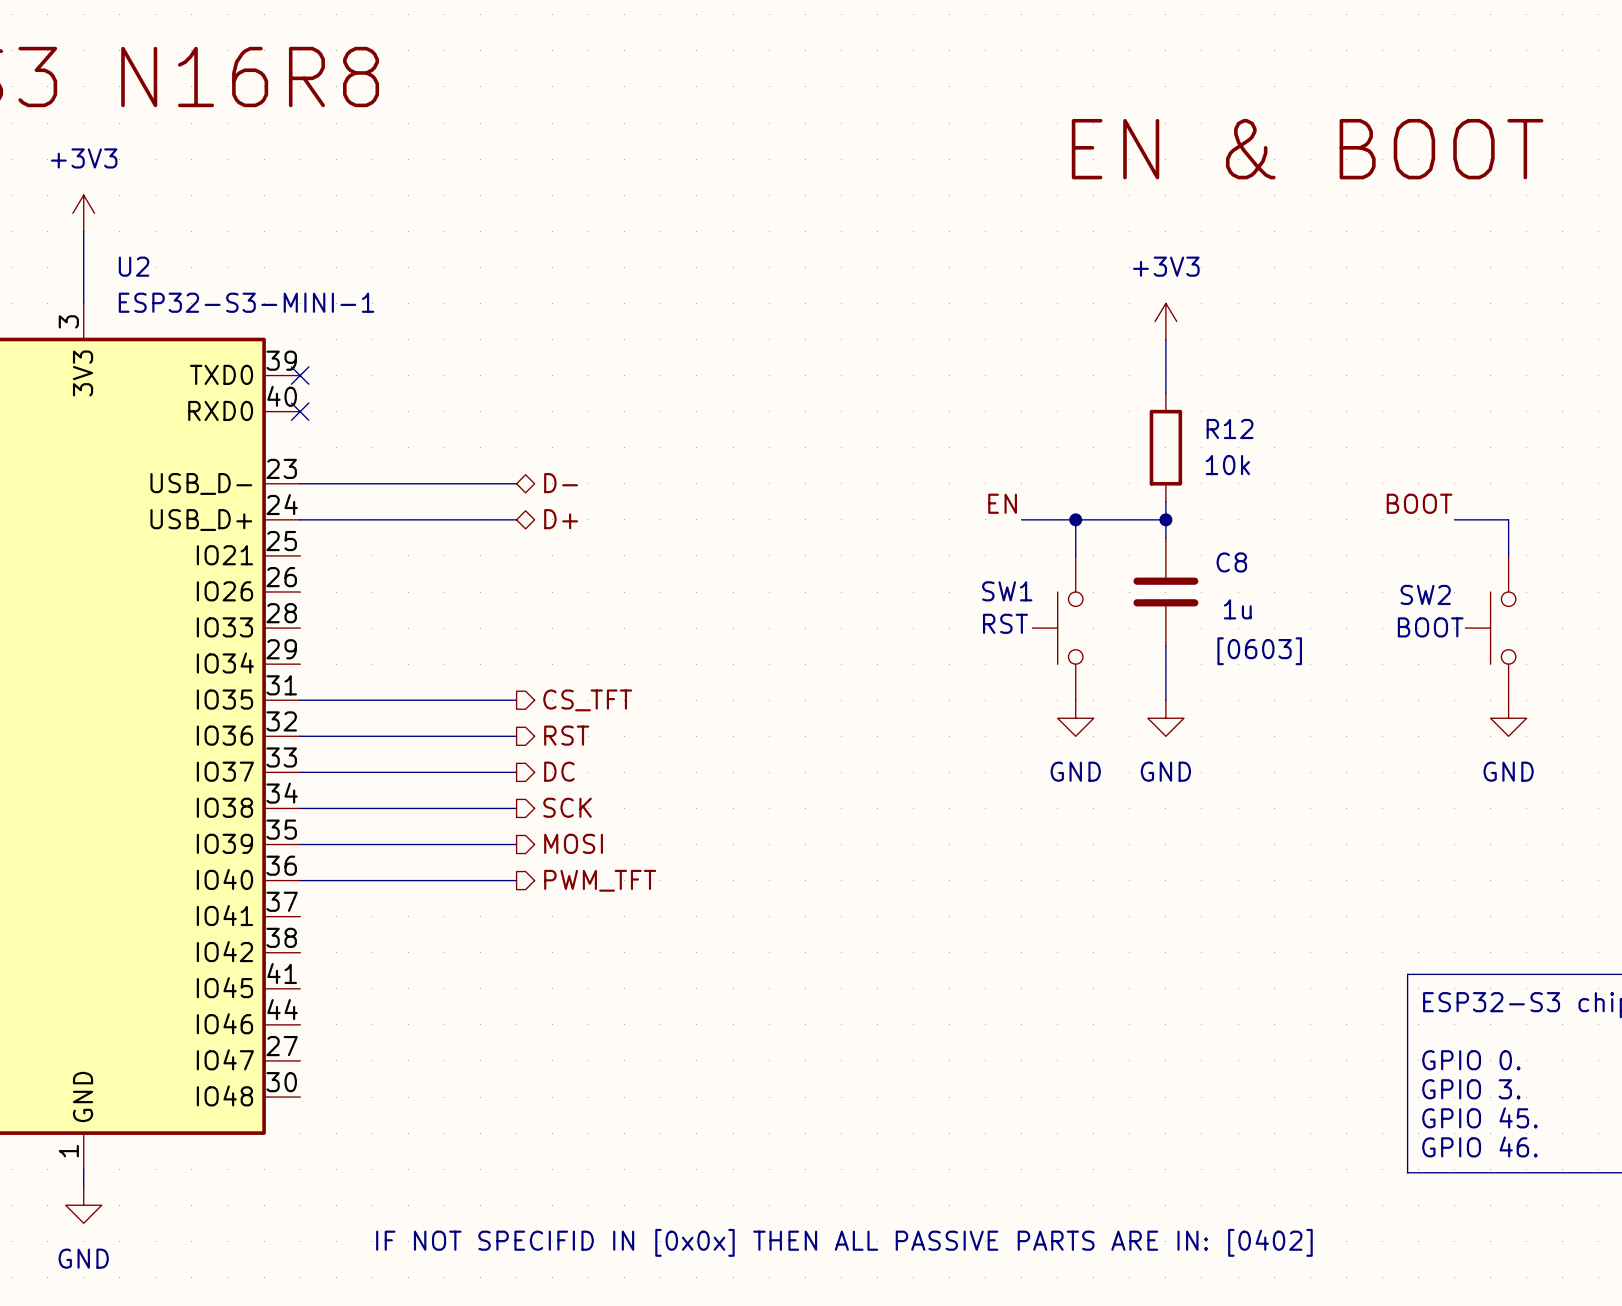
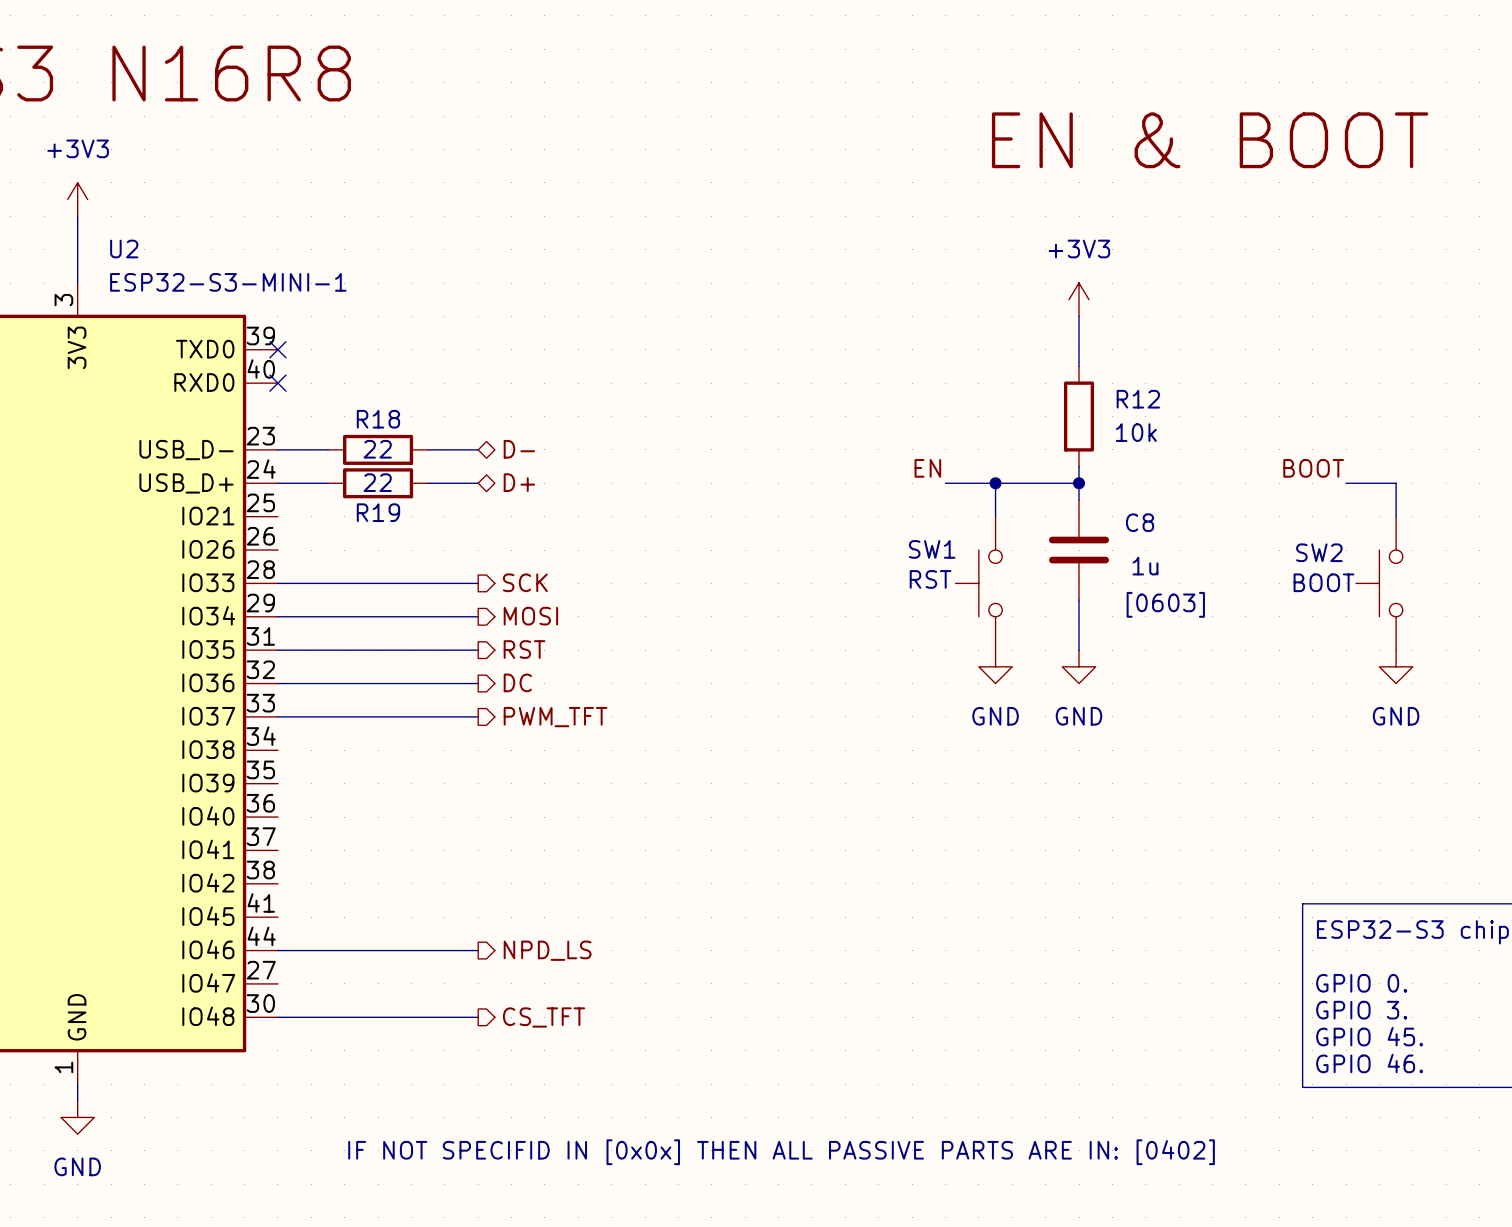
wire: (354, 483) (462, 483) -> none
R18: none -> 22 (378, 449)
wire: (354, 519) (462, 519) -> none
R19: none -> 22 (378, 483)
hierarchical label: CS_TFT (587, 700) -> RST (524, 649)
hierarchical label: RST (566, 735) -> DC (517, 682)
hierarchical label: DC (559, 771) -> PWM_TFT (555, 717)
hierarchical label position: SCK (567, 807) -> SCK (525, 582)
wire: (300, 808) (516, 808) -> (277, 583) (478, 583)
hierarchical label position: MOSI (573, 843) -> MOSI (530, 616)
wire: (300, 844) (516, 844) -> (277, 616) (478, 616)
wire: (300, 880) (516, 880) -> (277, 1017) (478, 1017)
hierarchical label: PWM_TFT (600, 880) -> none
wire: none -> (277, 950) (478, 950)
hierarchical label: none -> NPD_LS (547, 950)
hierarchical label: none -> CS_TFT (544, 1017)

